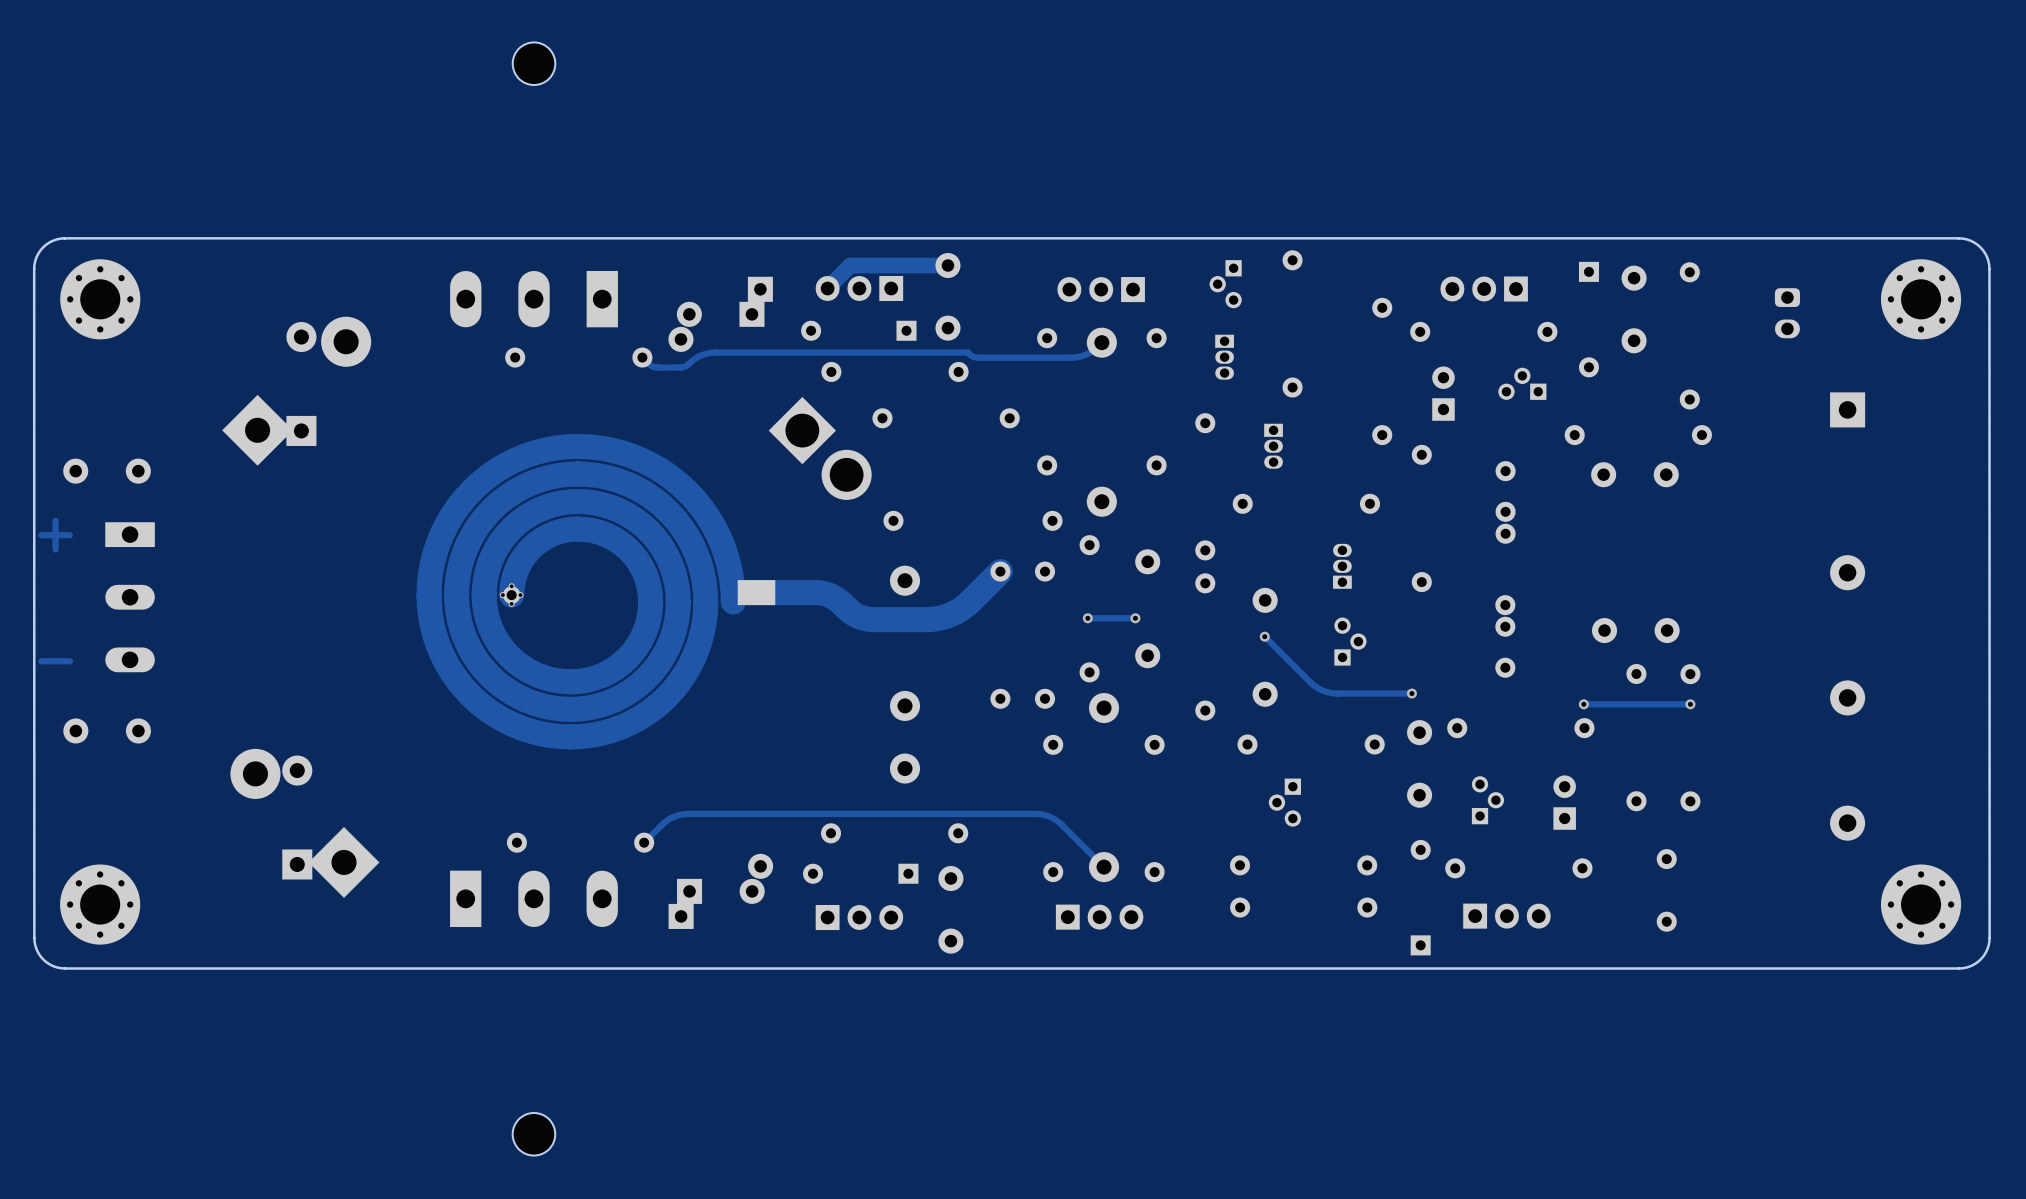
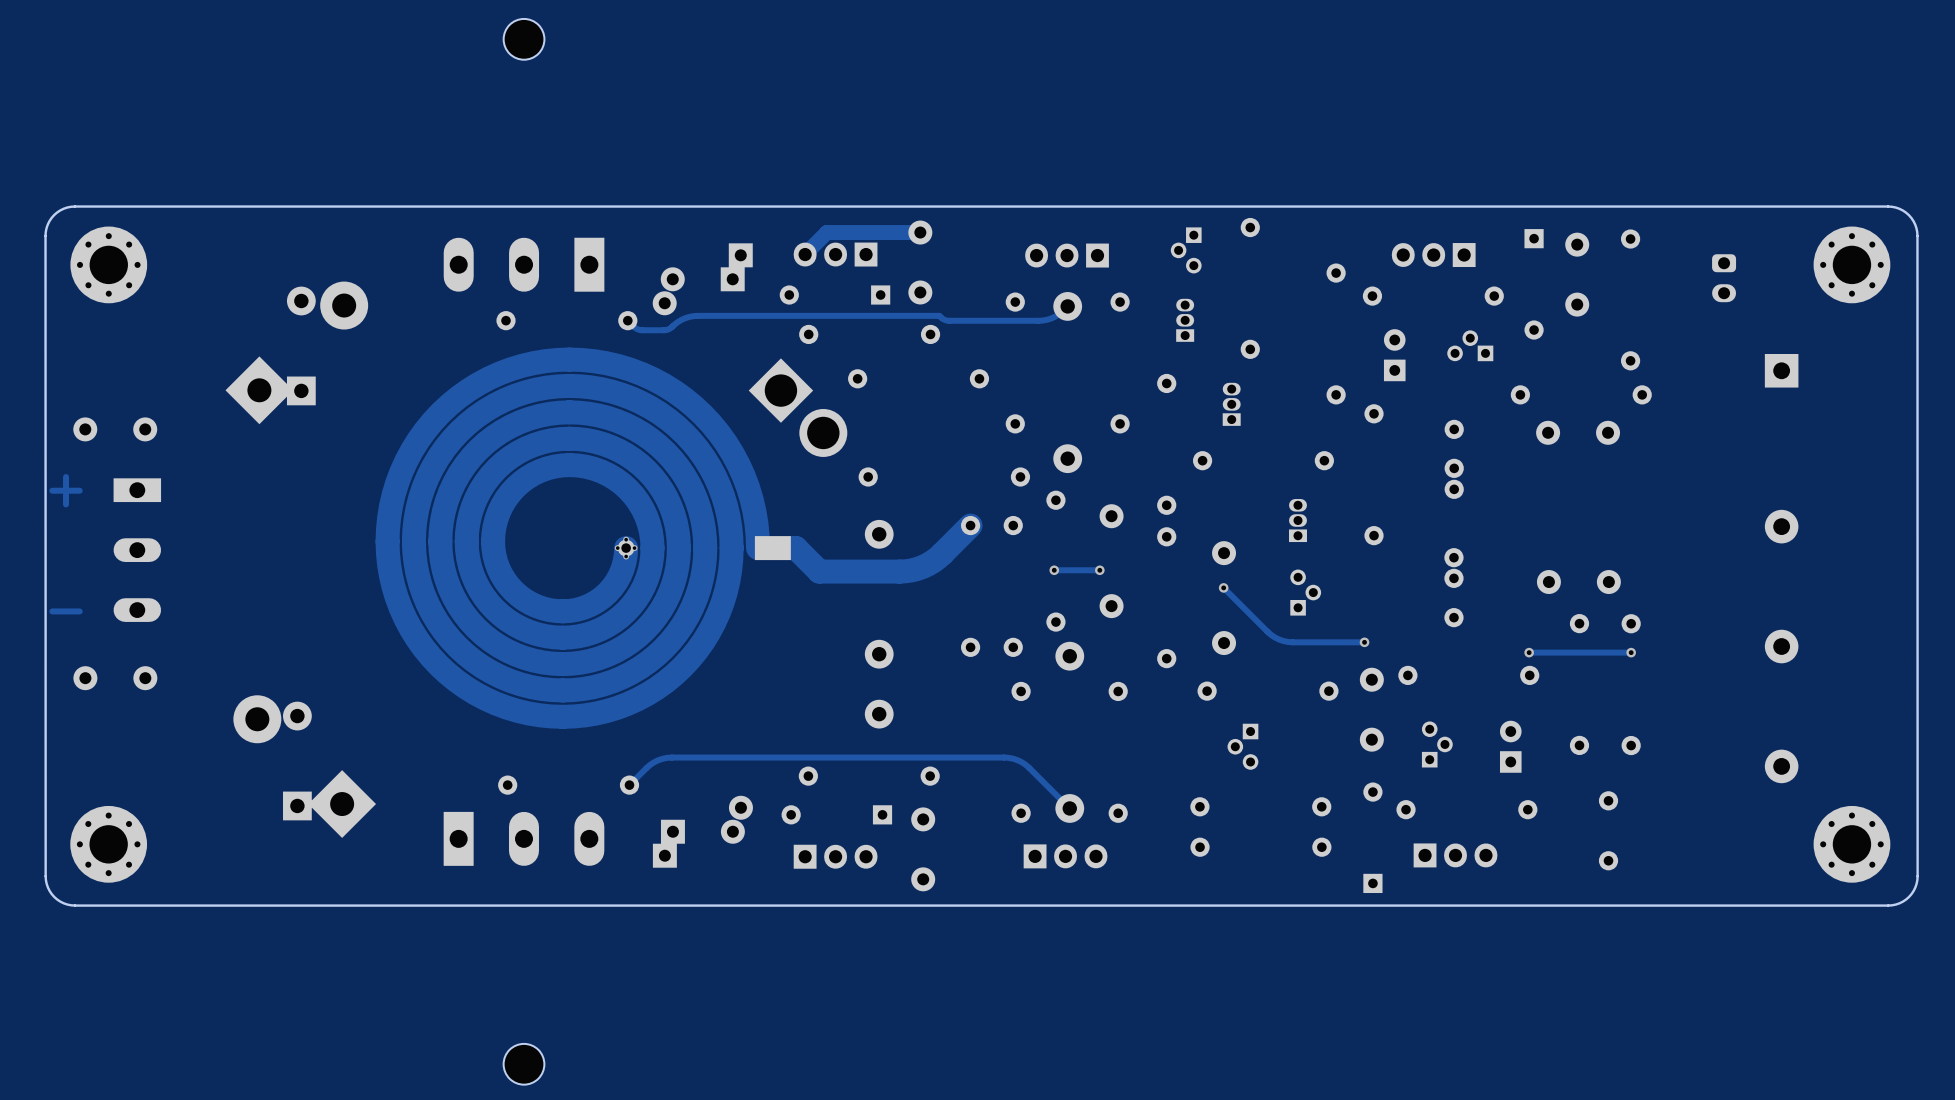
part rotation: 0° (1224, 357) -> 180° (1185, 320)
part footprint: [416, 433, 776, 750] -> [375, 347, 791, 729]
part rotation: 0° (1273, 446) -> 180° (1231, 404)
via: (511, 586) -> none
via: none -> (626, 539)
track: (756, 592) (822, 593) (836, 598) (854, 614) (873, 619) -> (791, 548) (795, 548) (819, 571) (849, 571)
via: (502, 595) -> none
via: (520, 595) -> none
via: none -> (617, 548)
via: none -> (634, 548)
via: (511, 603) -> none
via: none -> (626, 556)

